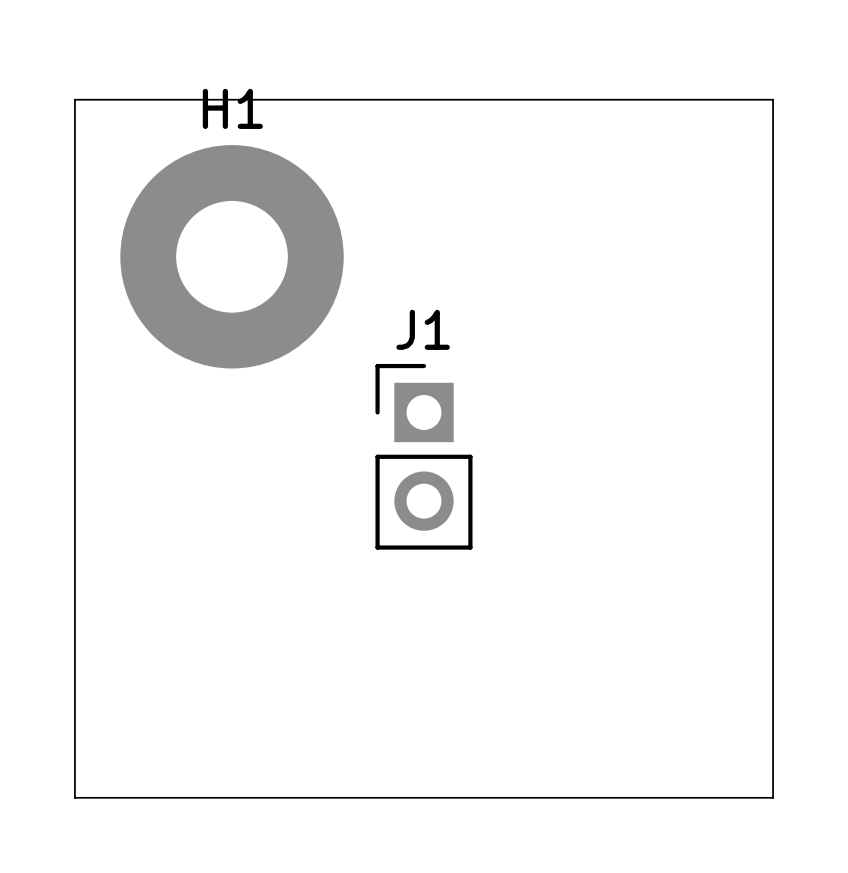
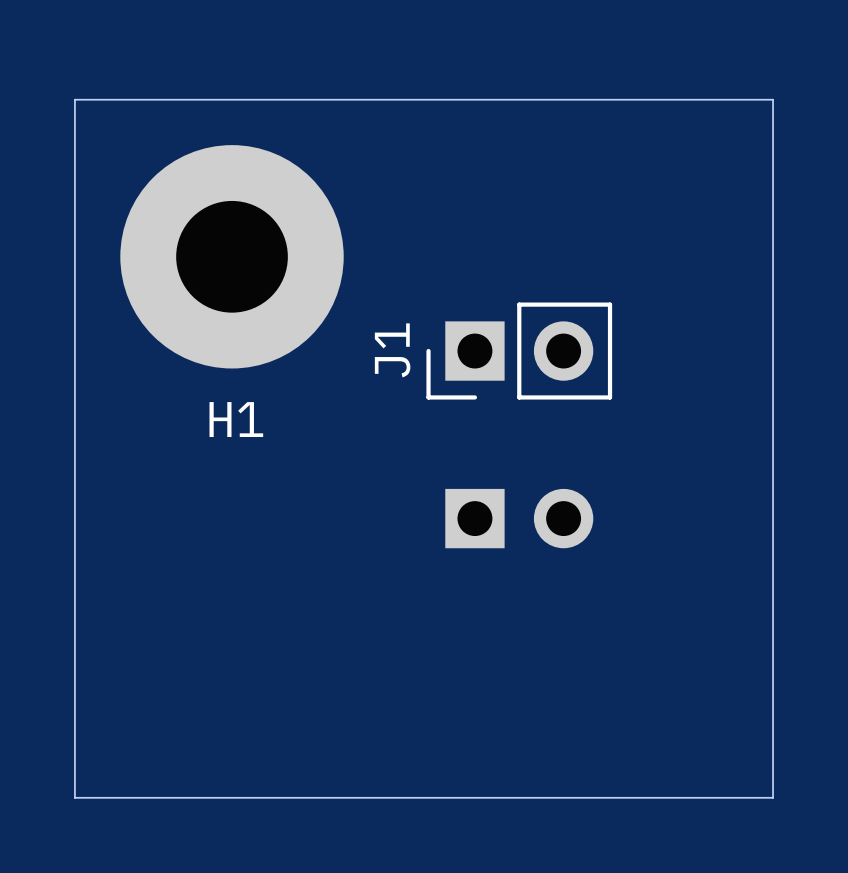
H1 name position: H1 (232, 108) -> H1 (236, 419)
J1 rotation: 0° (423, 456) -> 90° counterclockwise (519, 351)
J1 position: (423, 456) -> (519, 351)
part: none -> (519, 518)

